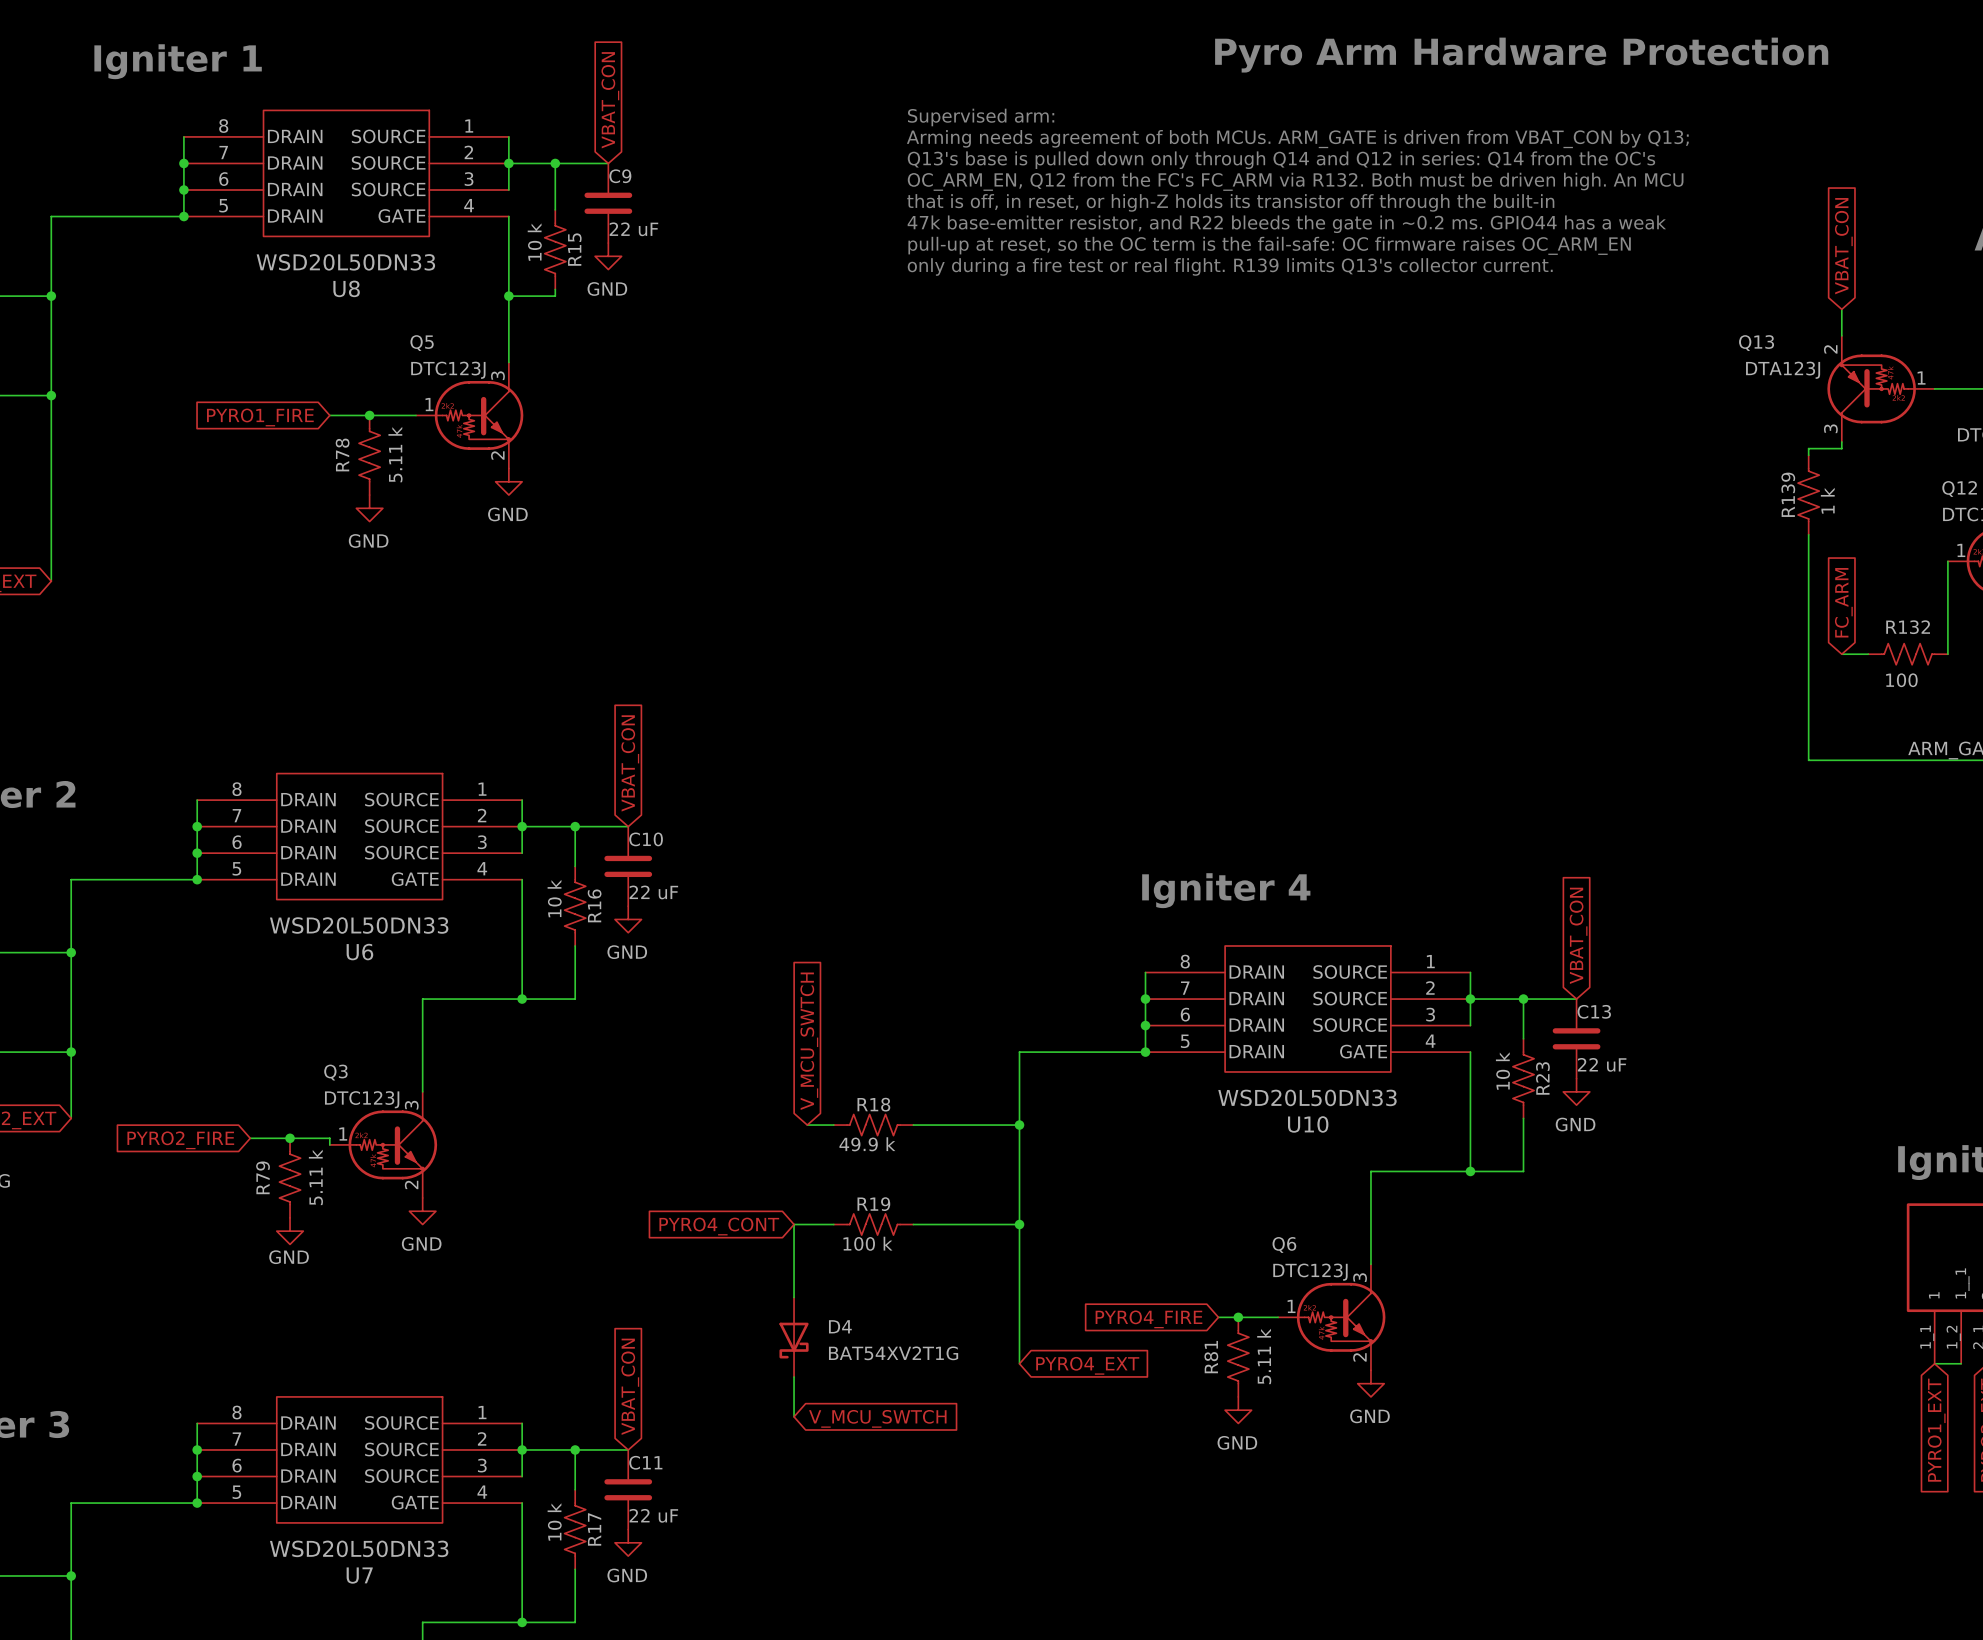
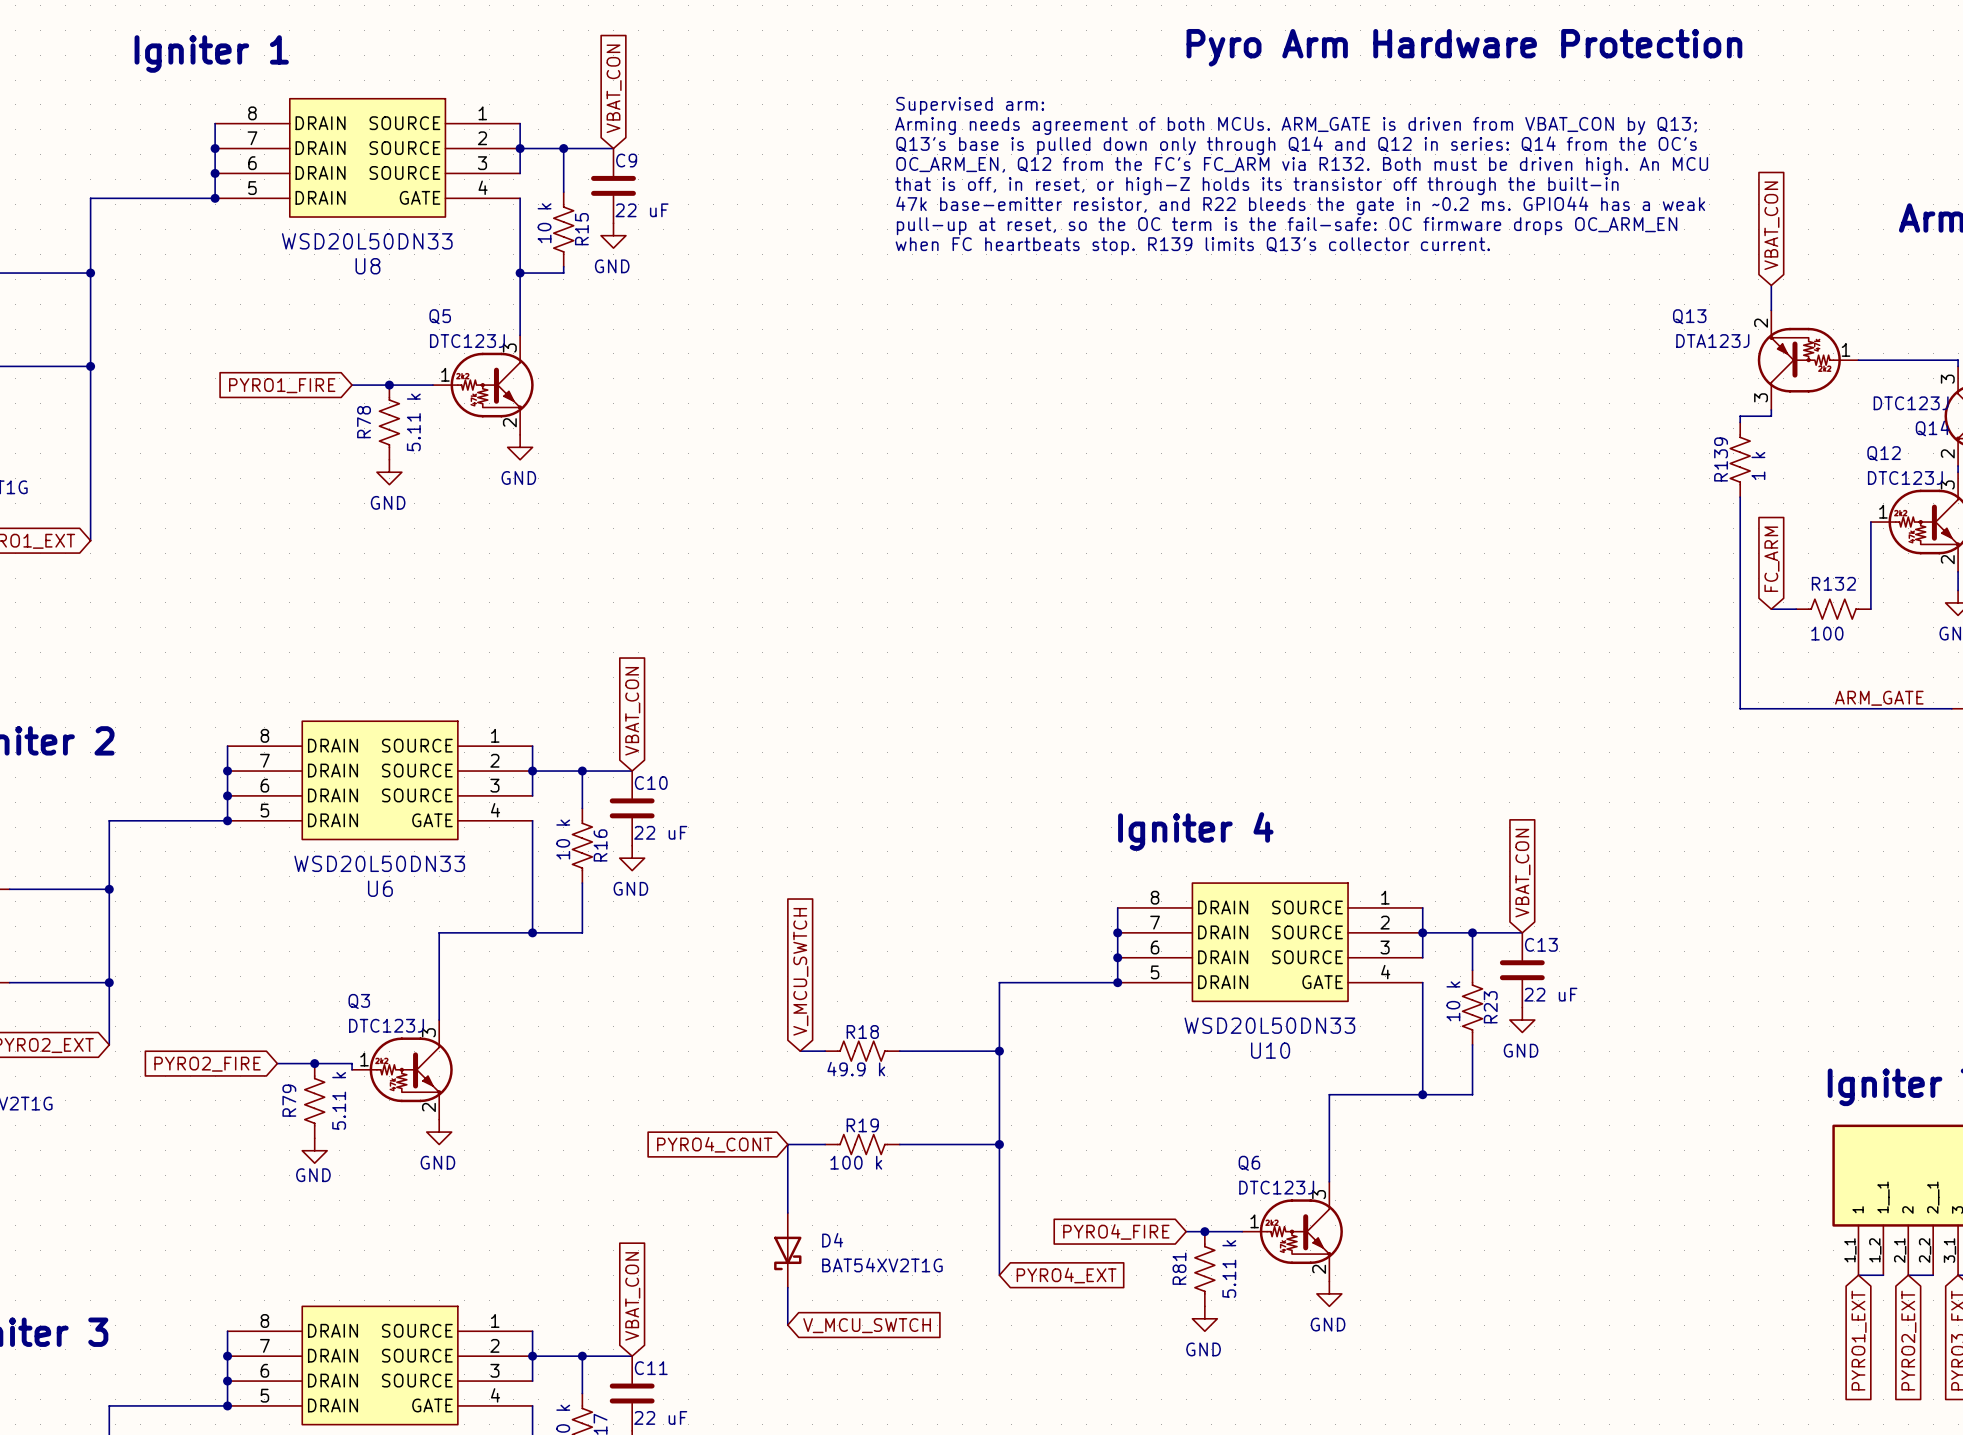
text: pull-up at reset, so the OC term is the fail-safe: OC firmware raises OC_ARM_EN (1269, 245) -> pull-up at reset, so the OC term is the fail-safe: OC firmware drops OC_ARM_EN (1287, 226)
text: only during a fire test or real flight. R139 limits Q13's collector current. (1230, 266) -> when FC heartbeats stop. R139 limits Q13's collector current. (1192, 246)

